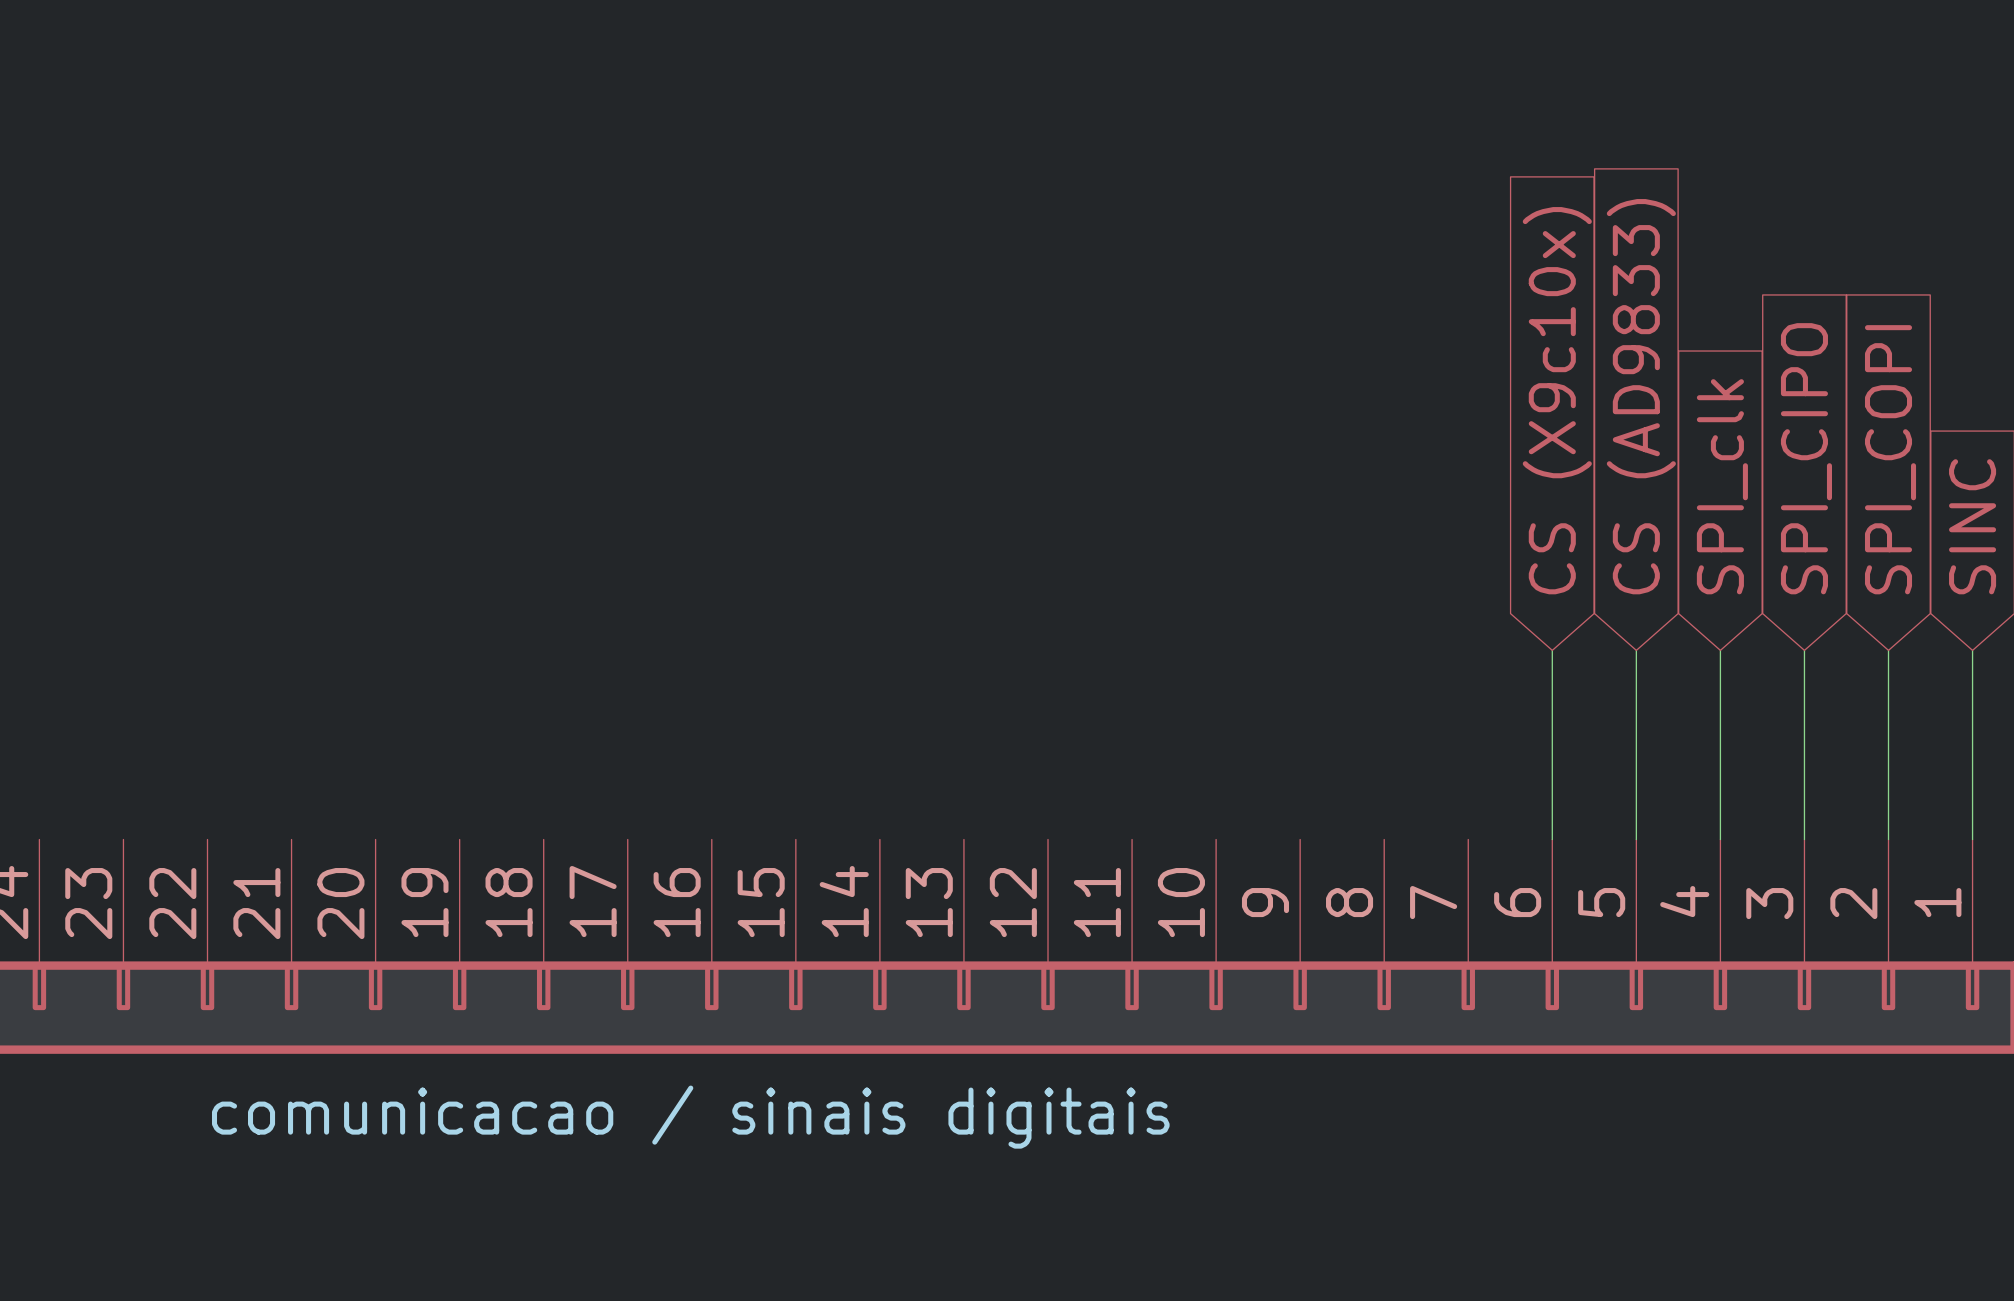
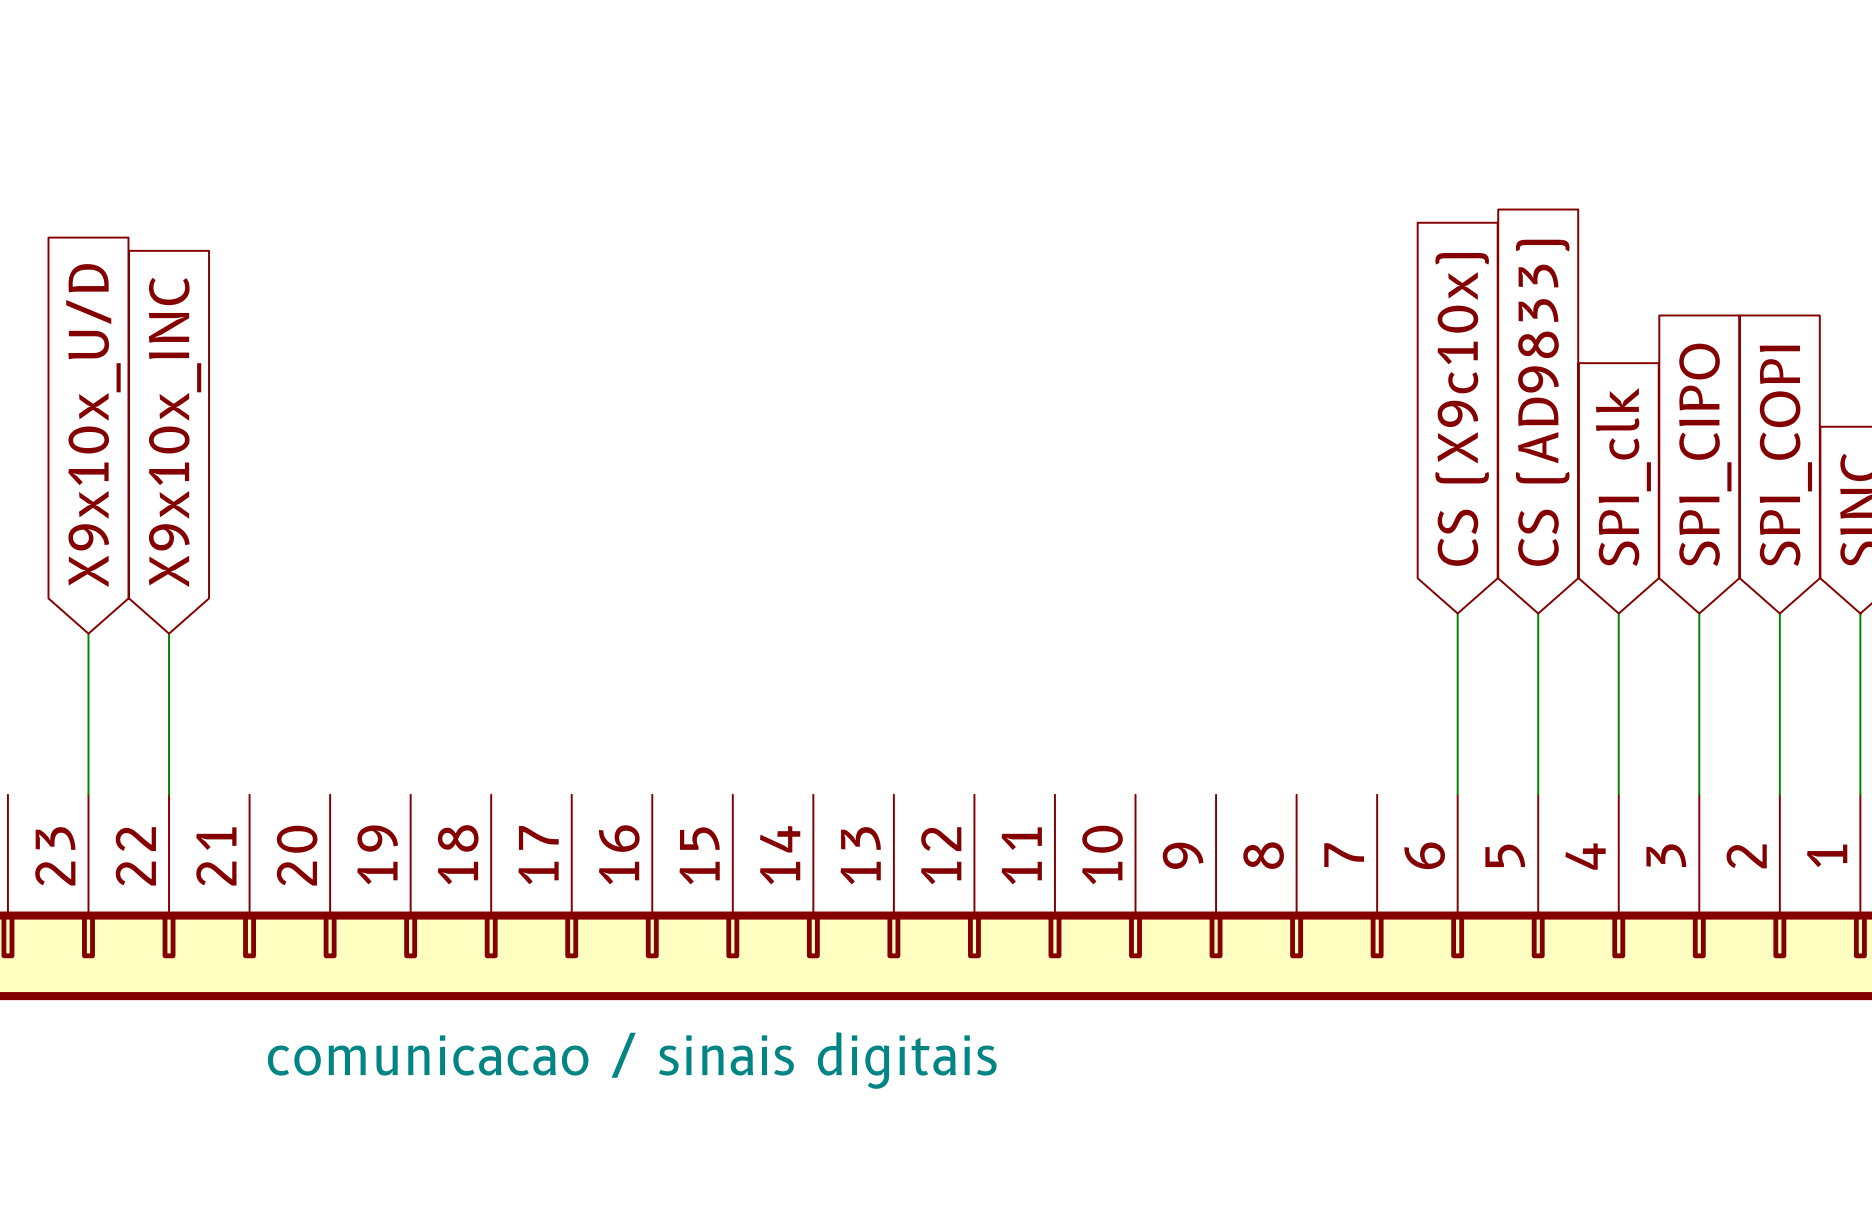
global label: none -> X9x10x_U/D (93, 425)
global label: none -> X9x10x_INC (175, 432)
wire: none -> (88, 633) (88, 794)
wire: none -> (169, 633) (169, 794)

